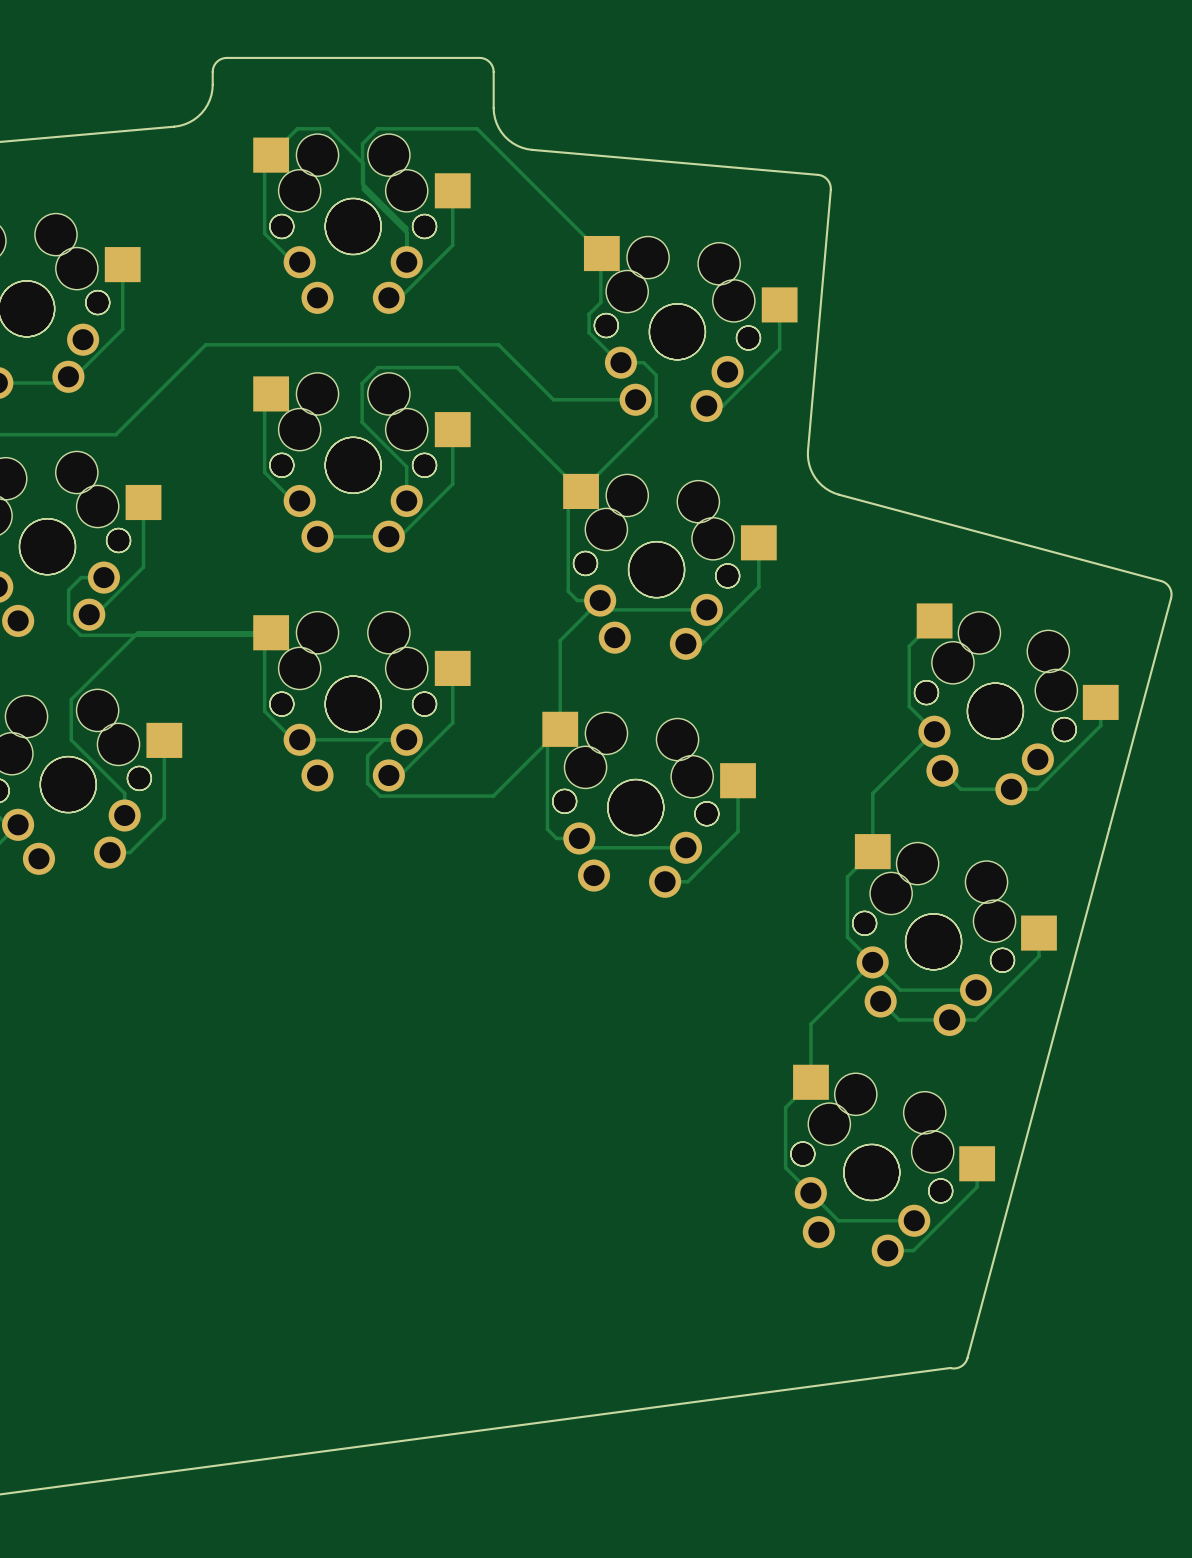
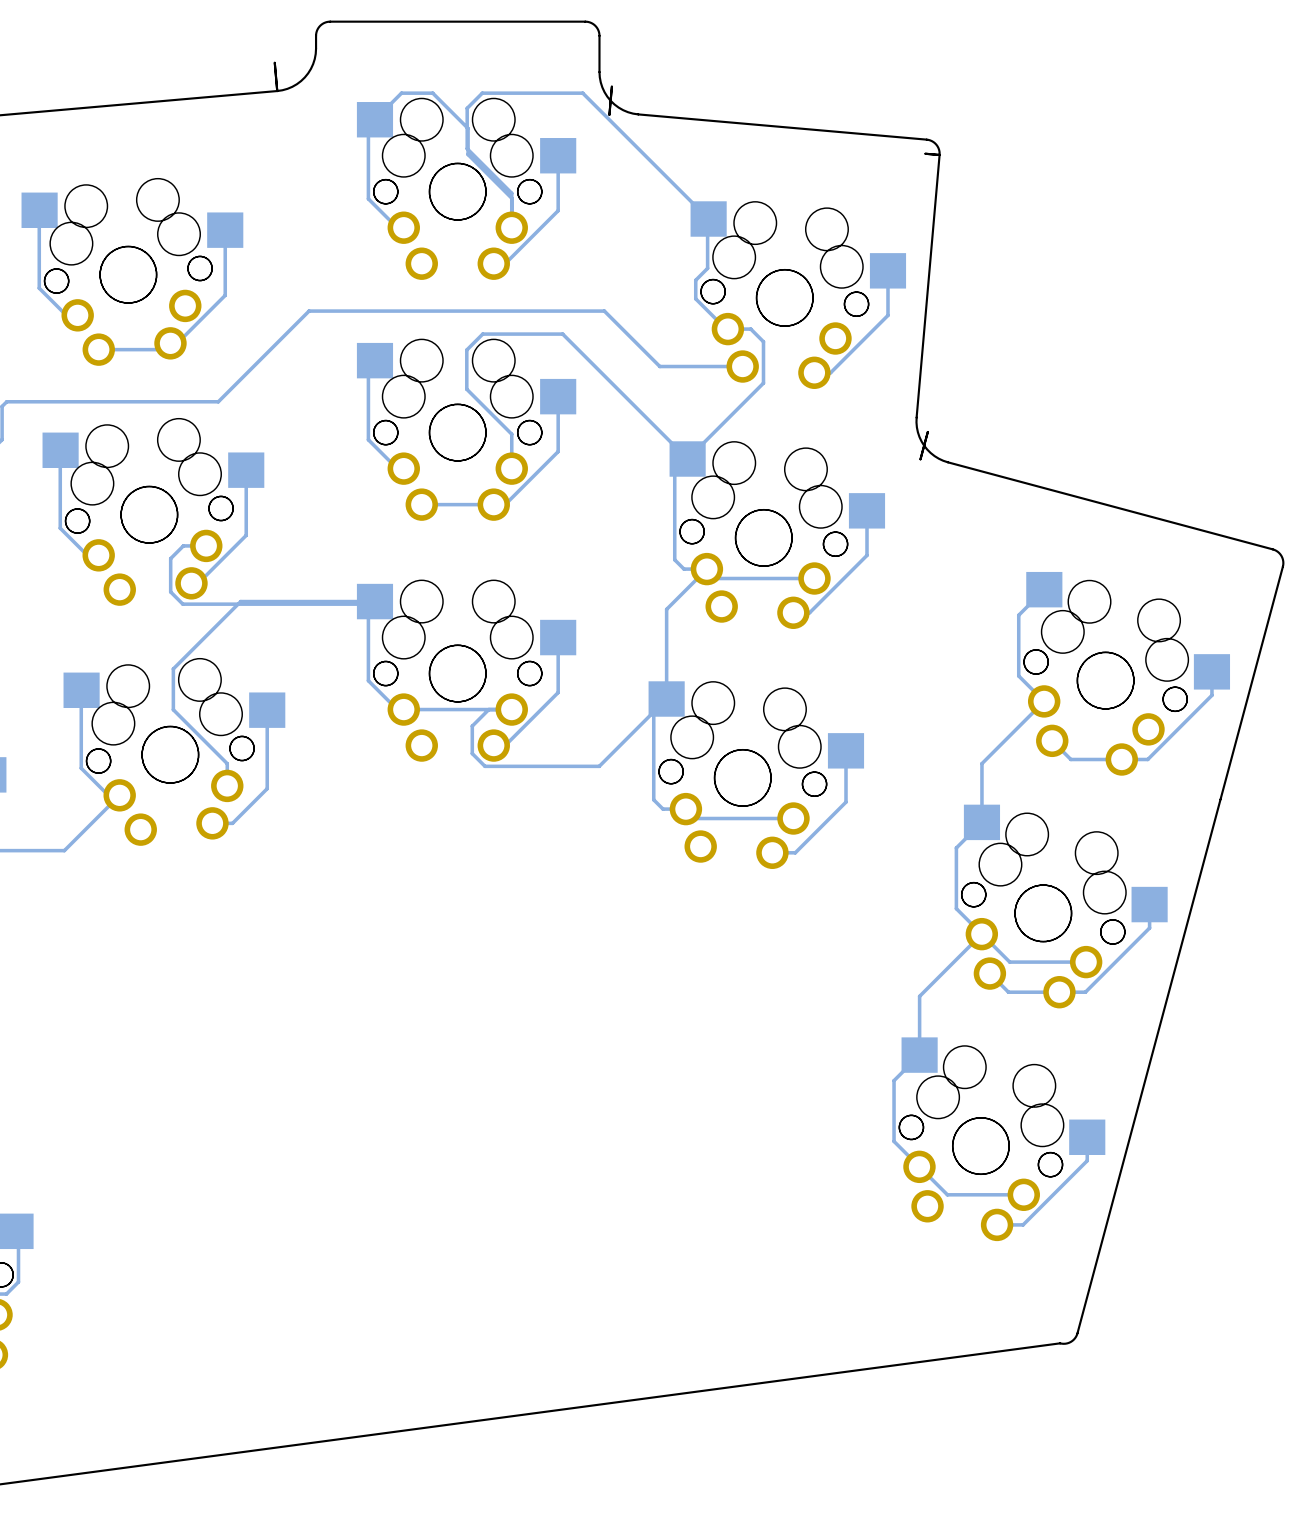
board edge: none -> (277, 91) (274, 62) (277, 91)
board edge: none -> (609, 114) (611, 86) (609, 114)
board edge: none -> (939, 154) (925, 153) (939, 154)
board edge: none -> (920, 459) (927, 431) (920, 459)

